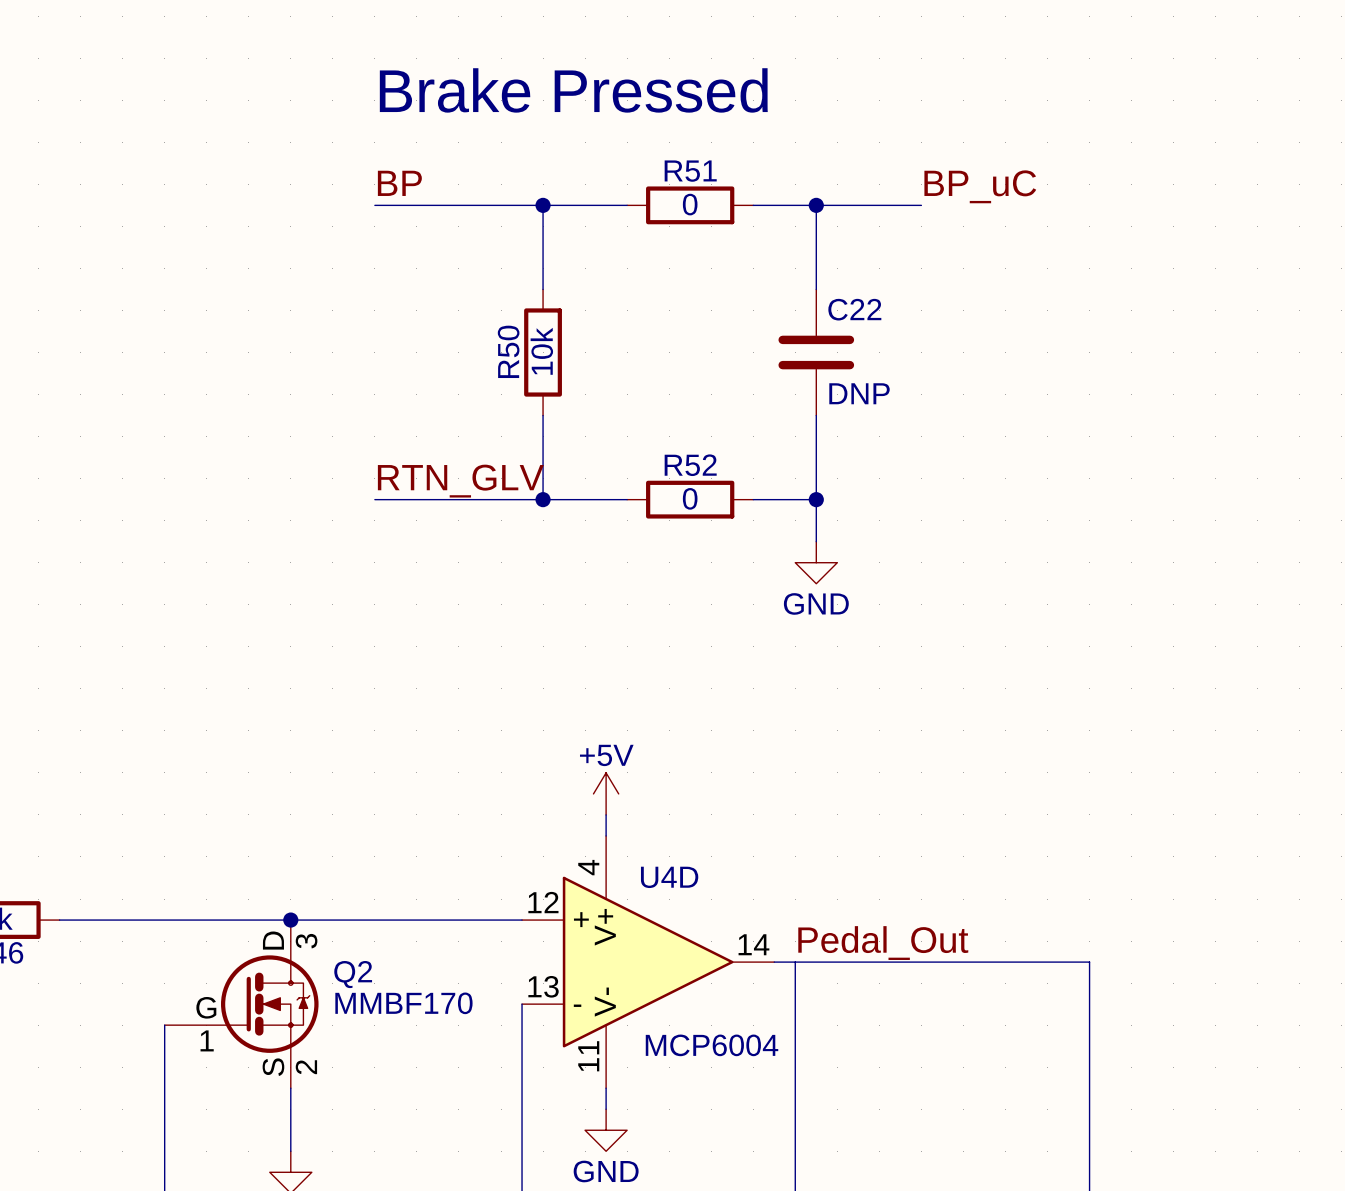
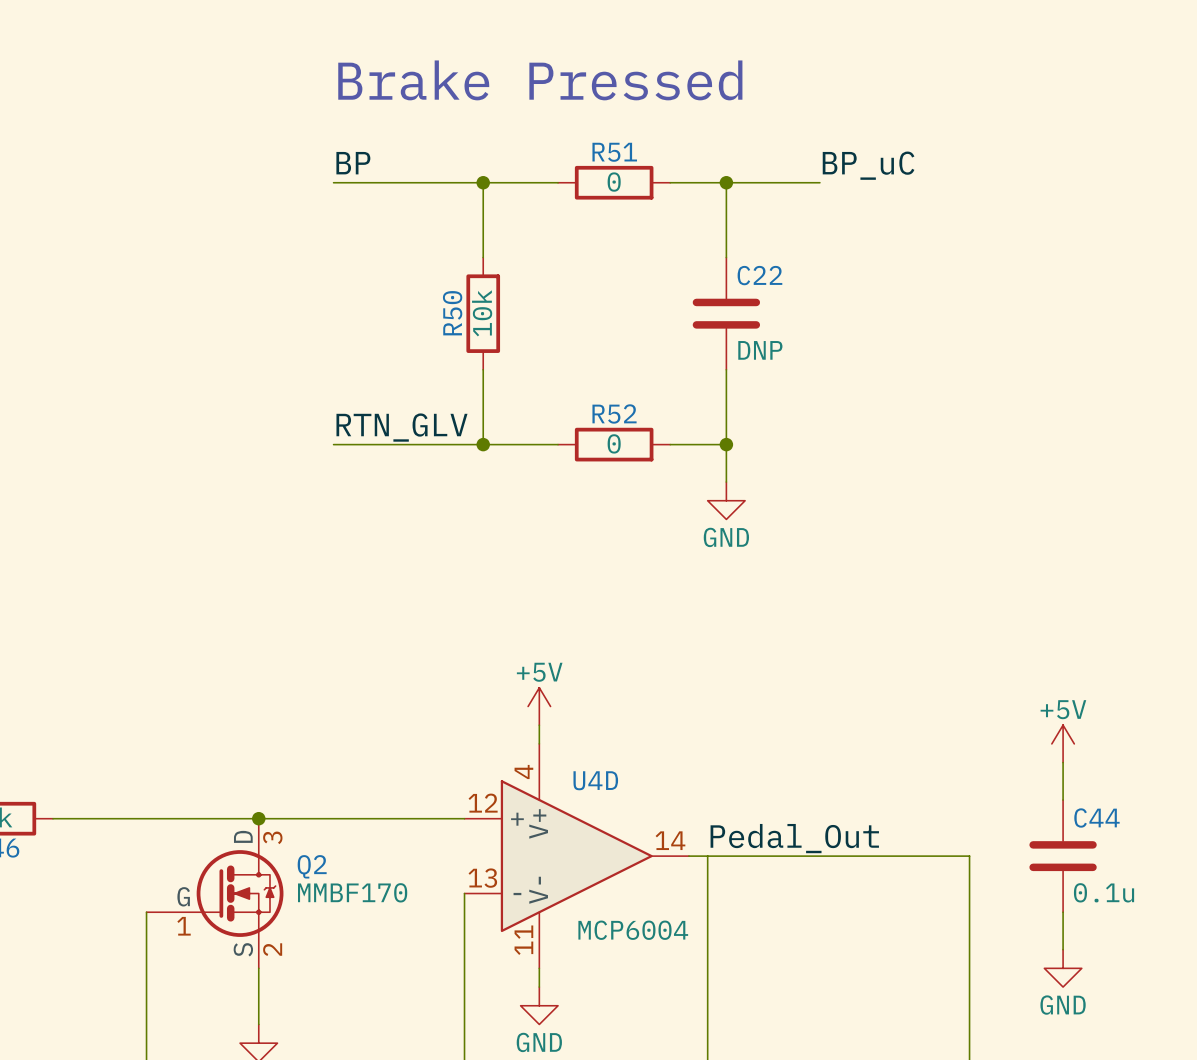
power symbol: none -> +5V (1063, 743)
wire: none -> (1063, 762) (1063, 800)
C44: none -> 0.1u (1063, 856)
wire: none -> (1063, 912) (1063, 949)
power symbol: none -> GND (1063, 968)

